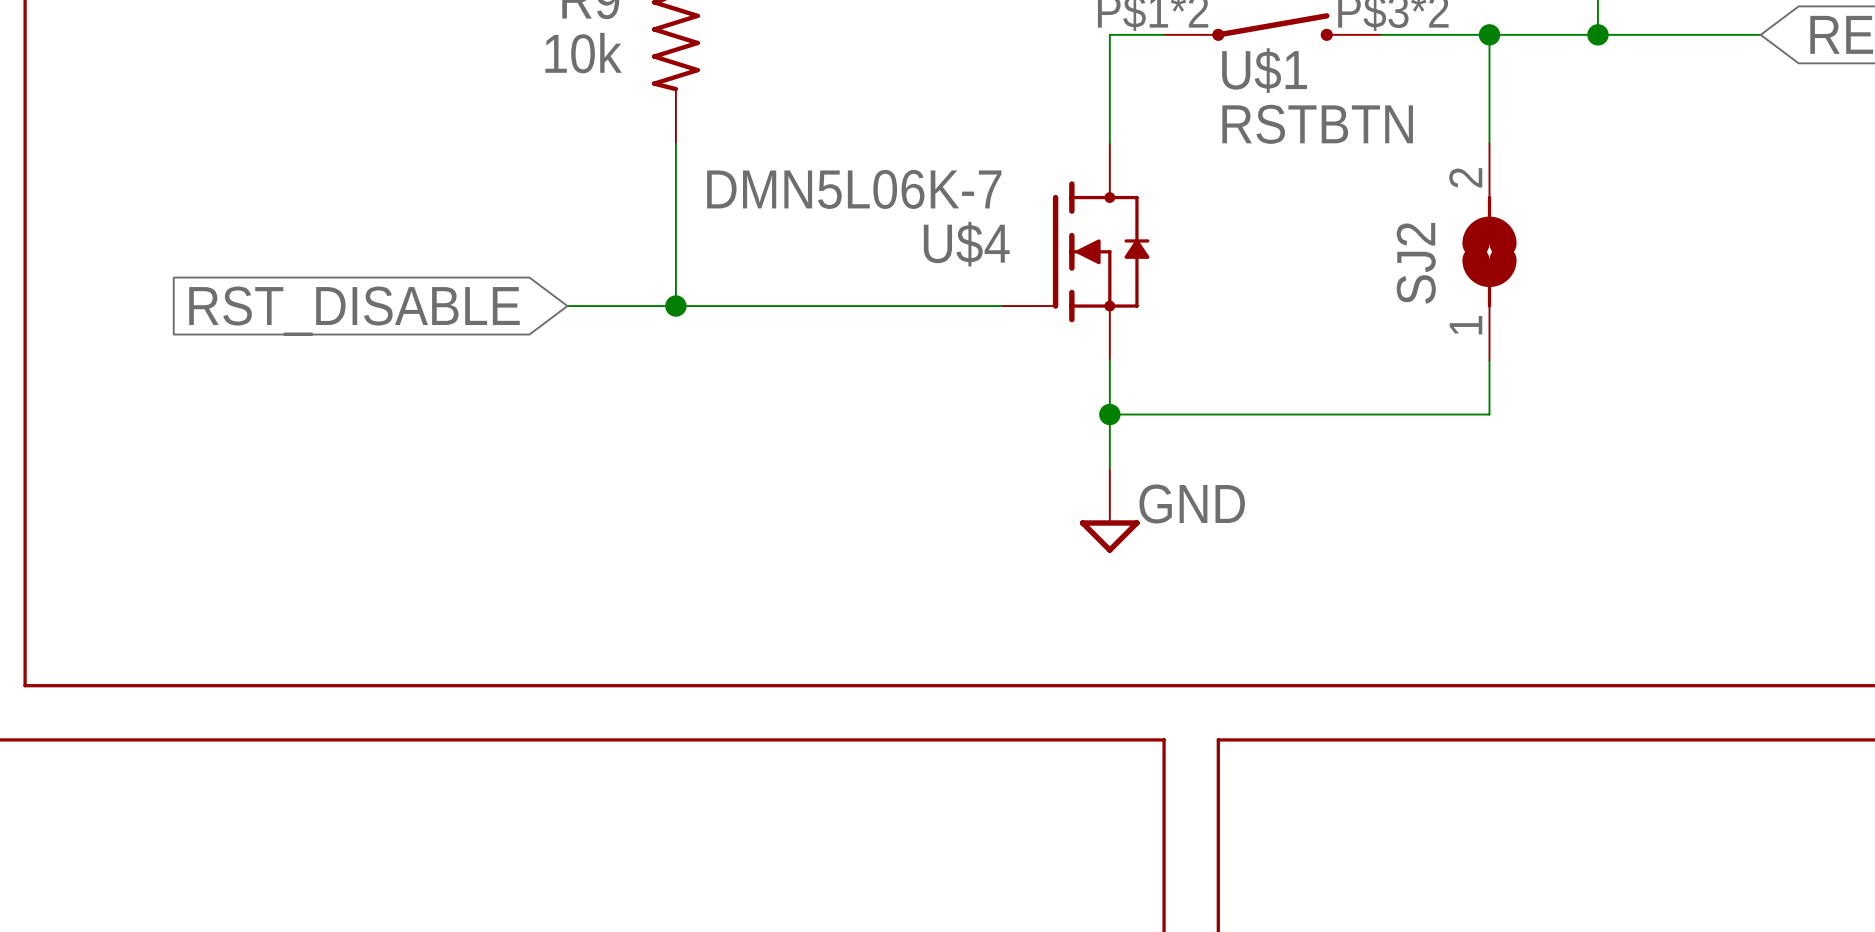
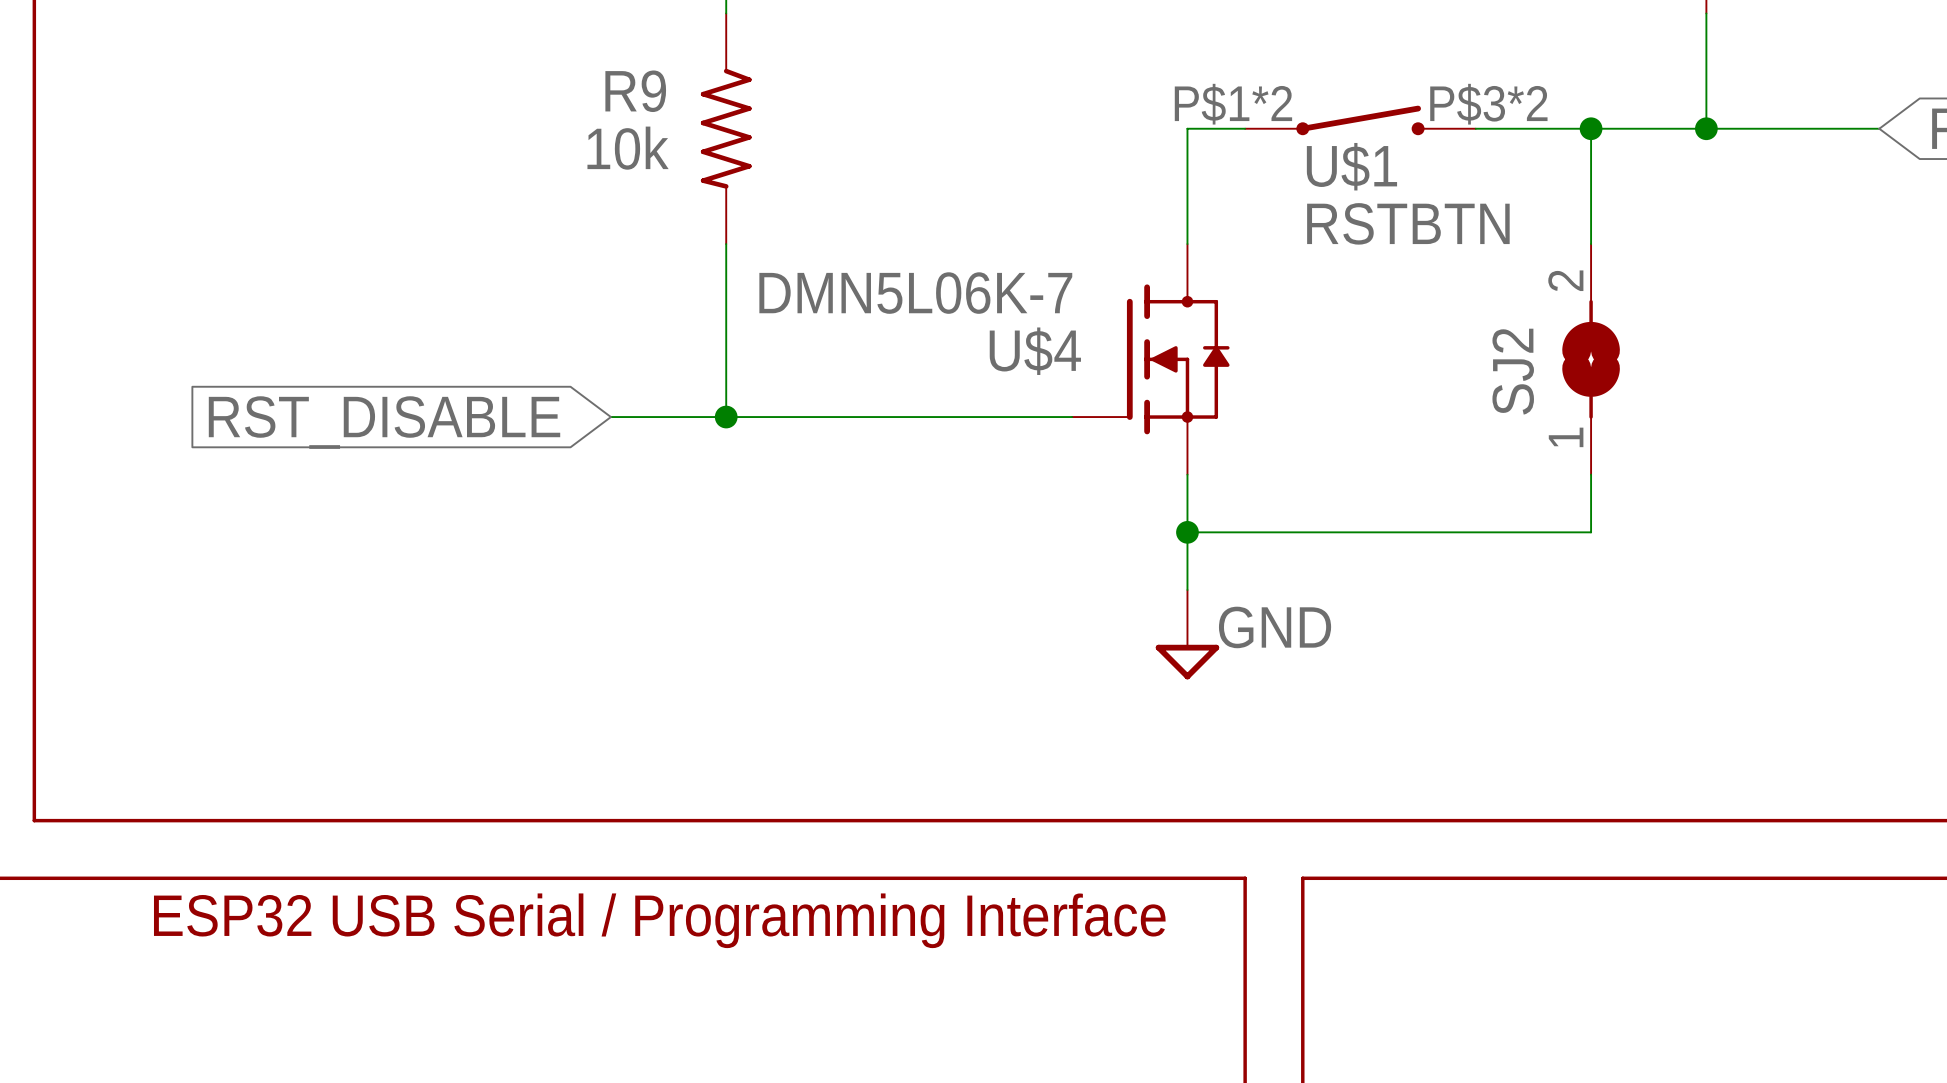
text: none -> ESP32 USB Serial / Programming Interface (659, 920)

